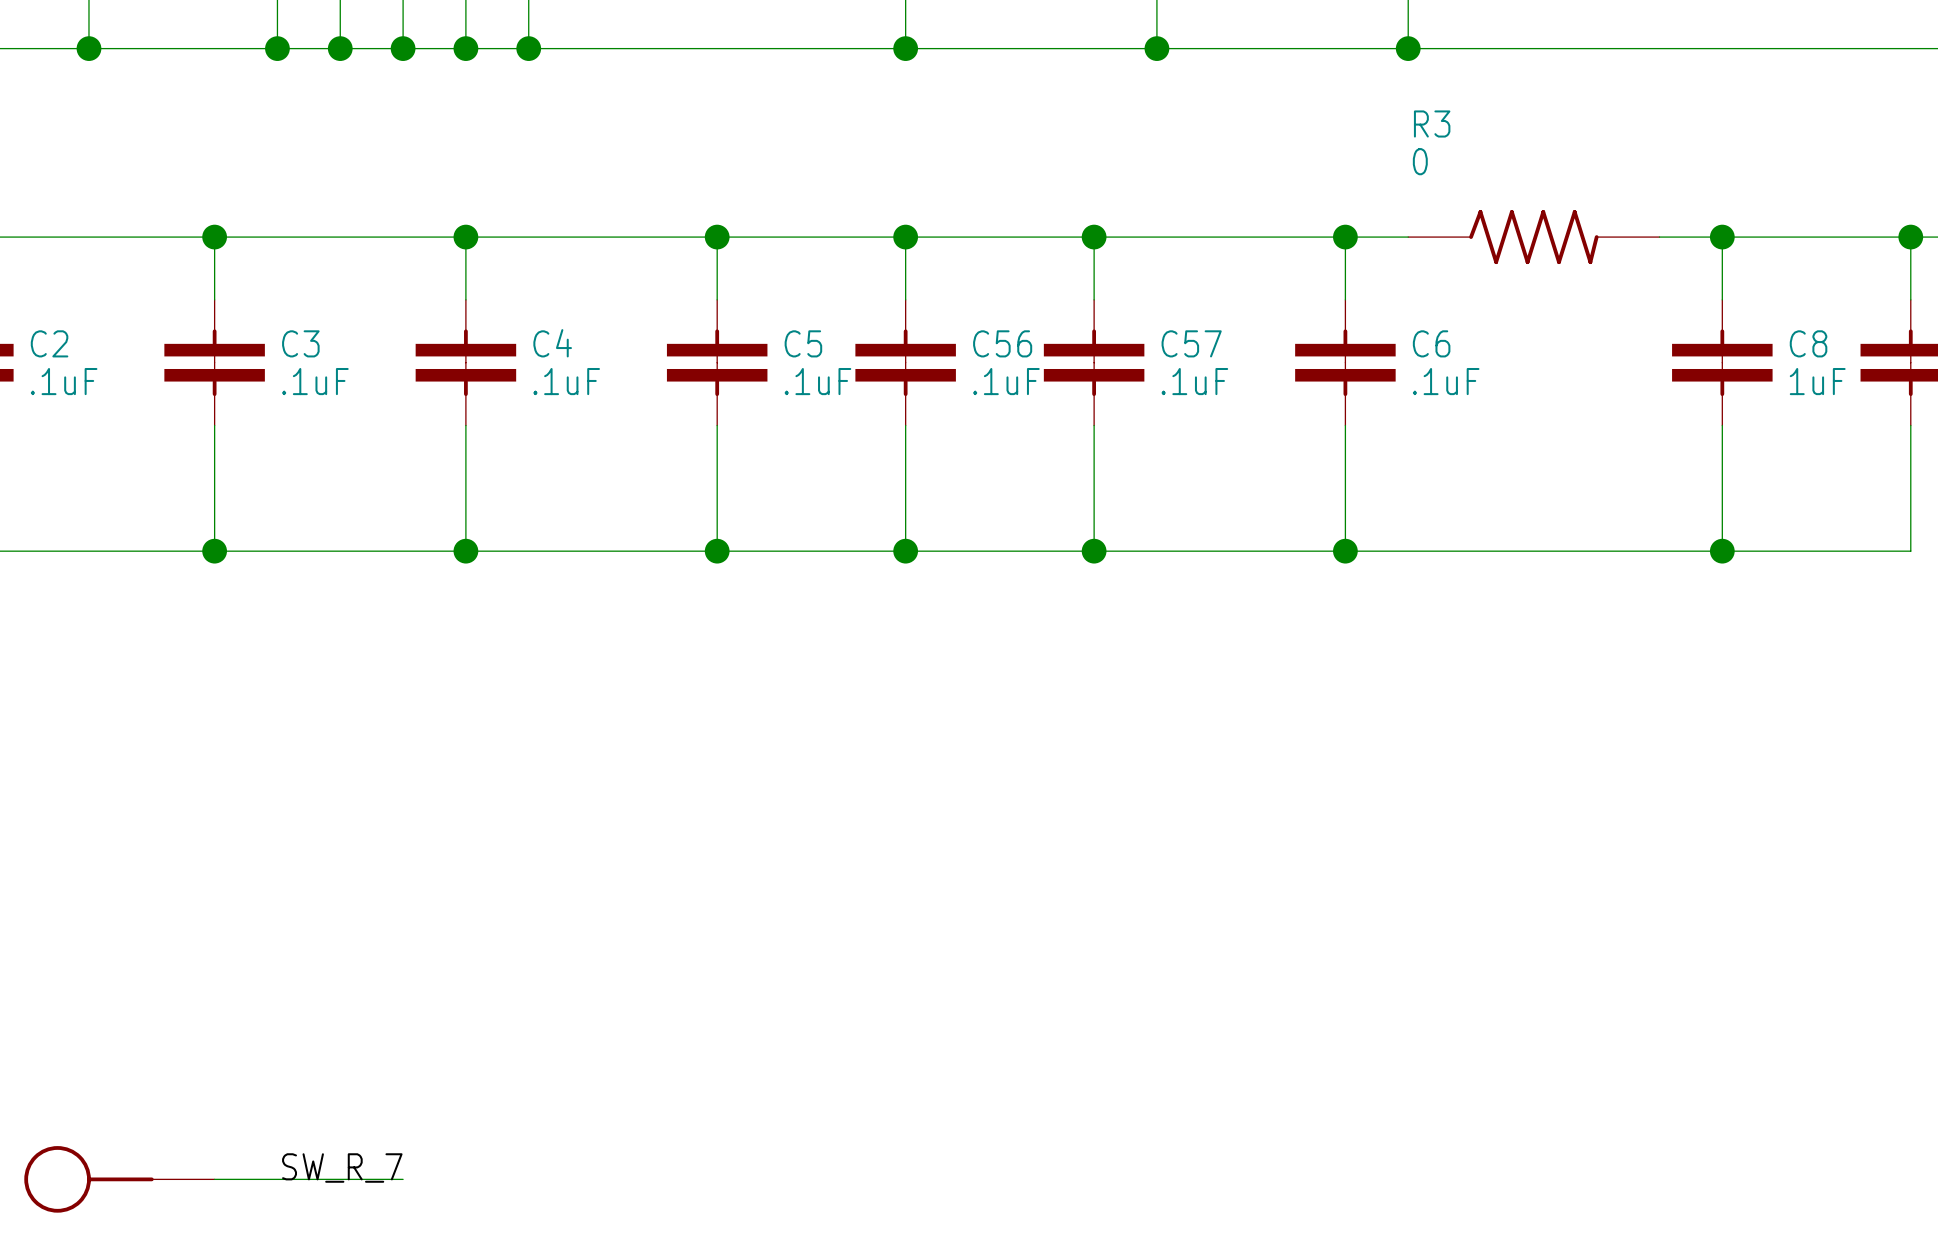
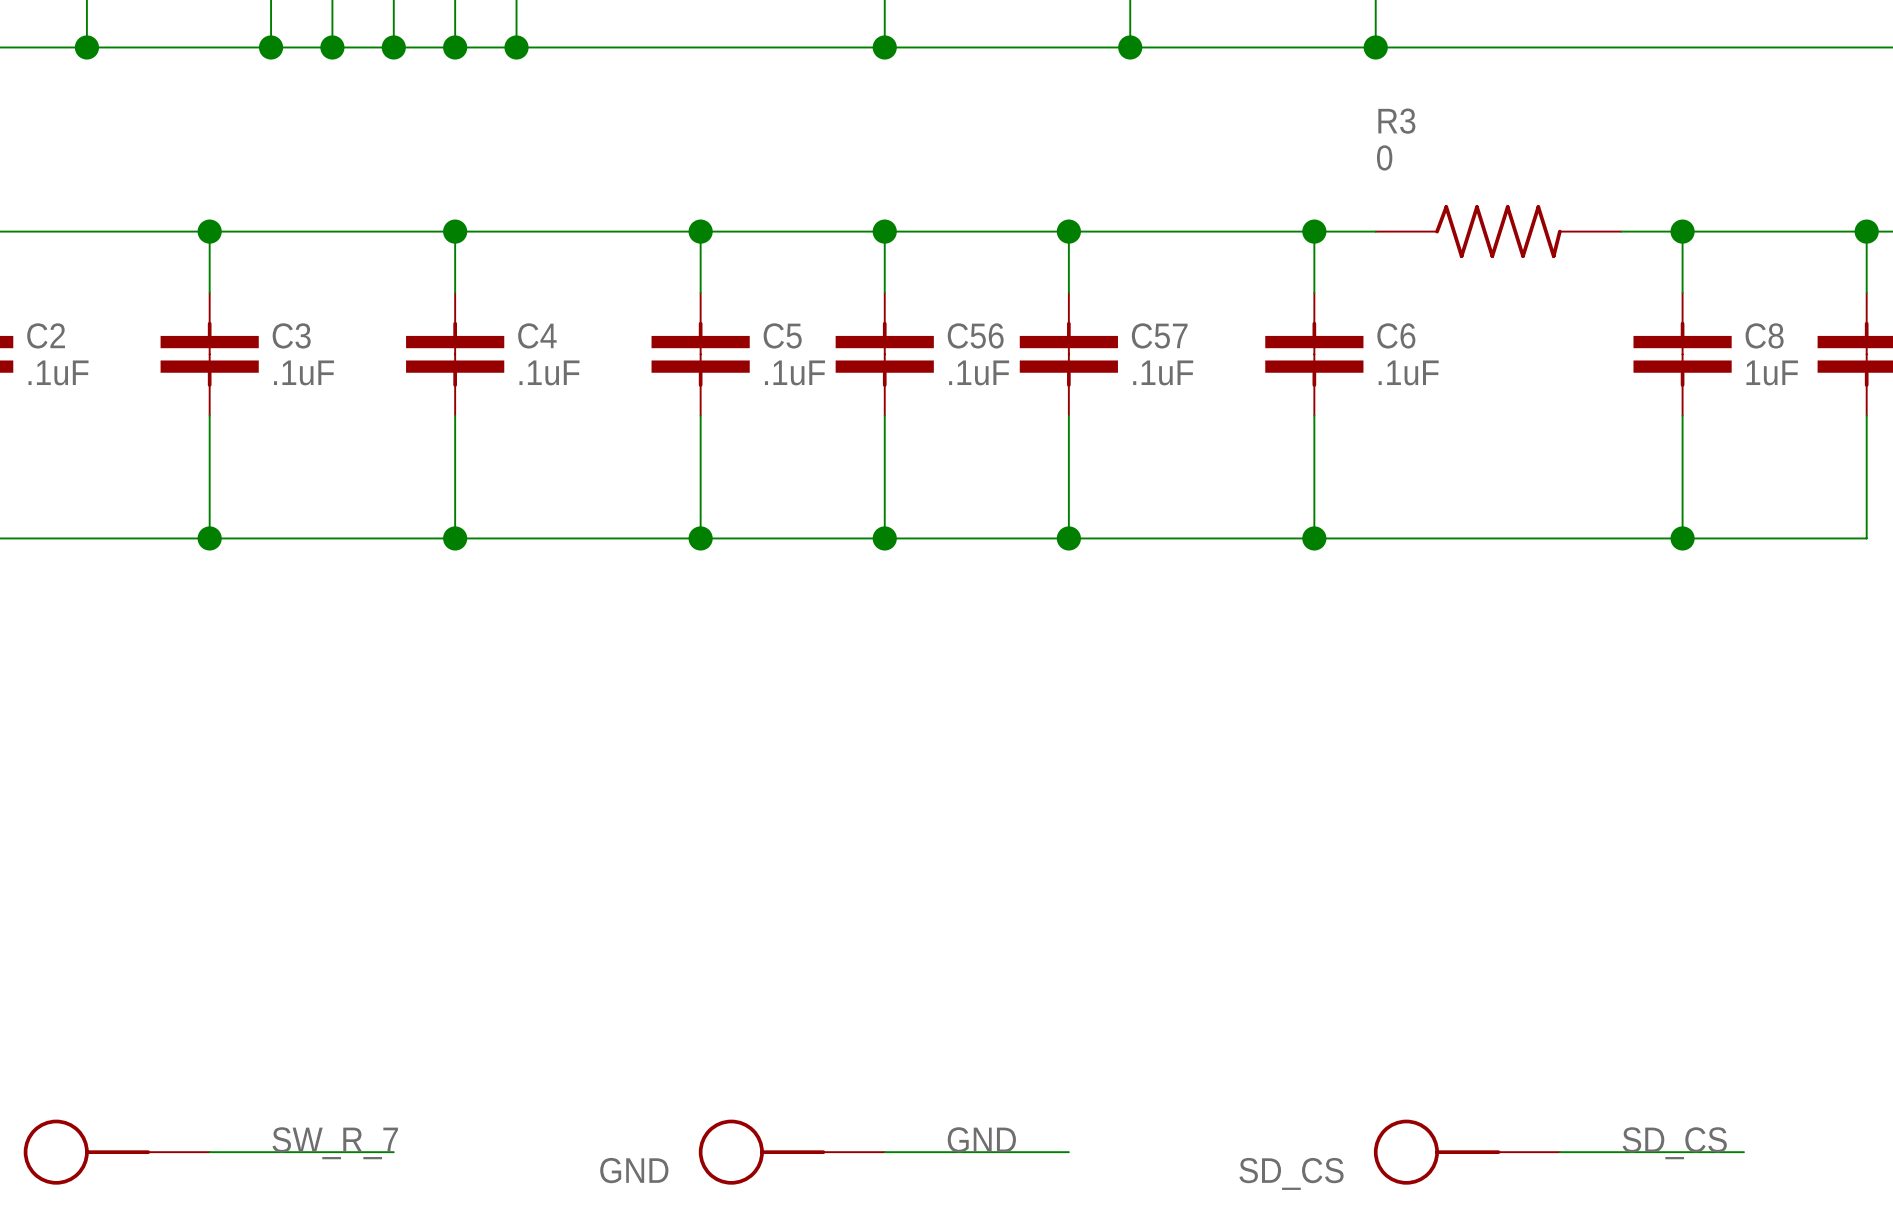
label: none -> GND (981, 1139)
label: none -> SD_CS (1674, 1143)
GND: none -> (791, 1152)
wire: none -> (884, 1152) (1068, 1152)
SD_CS: none -> (1466, 1152)
wire: none -> (1559, 1152) (1743, 1152)

